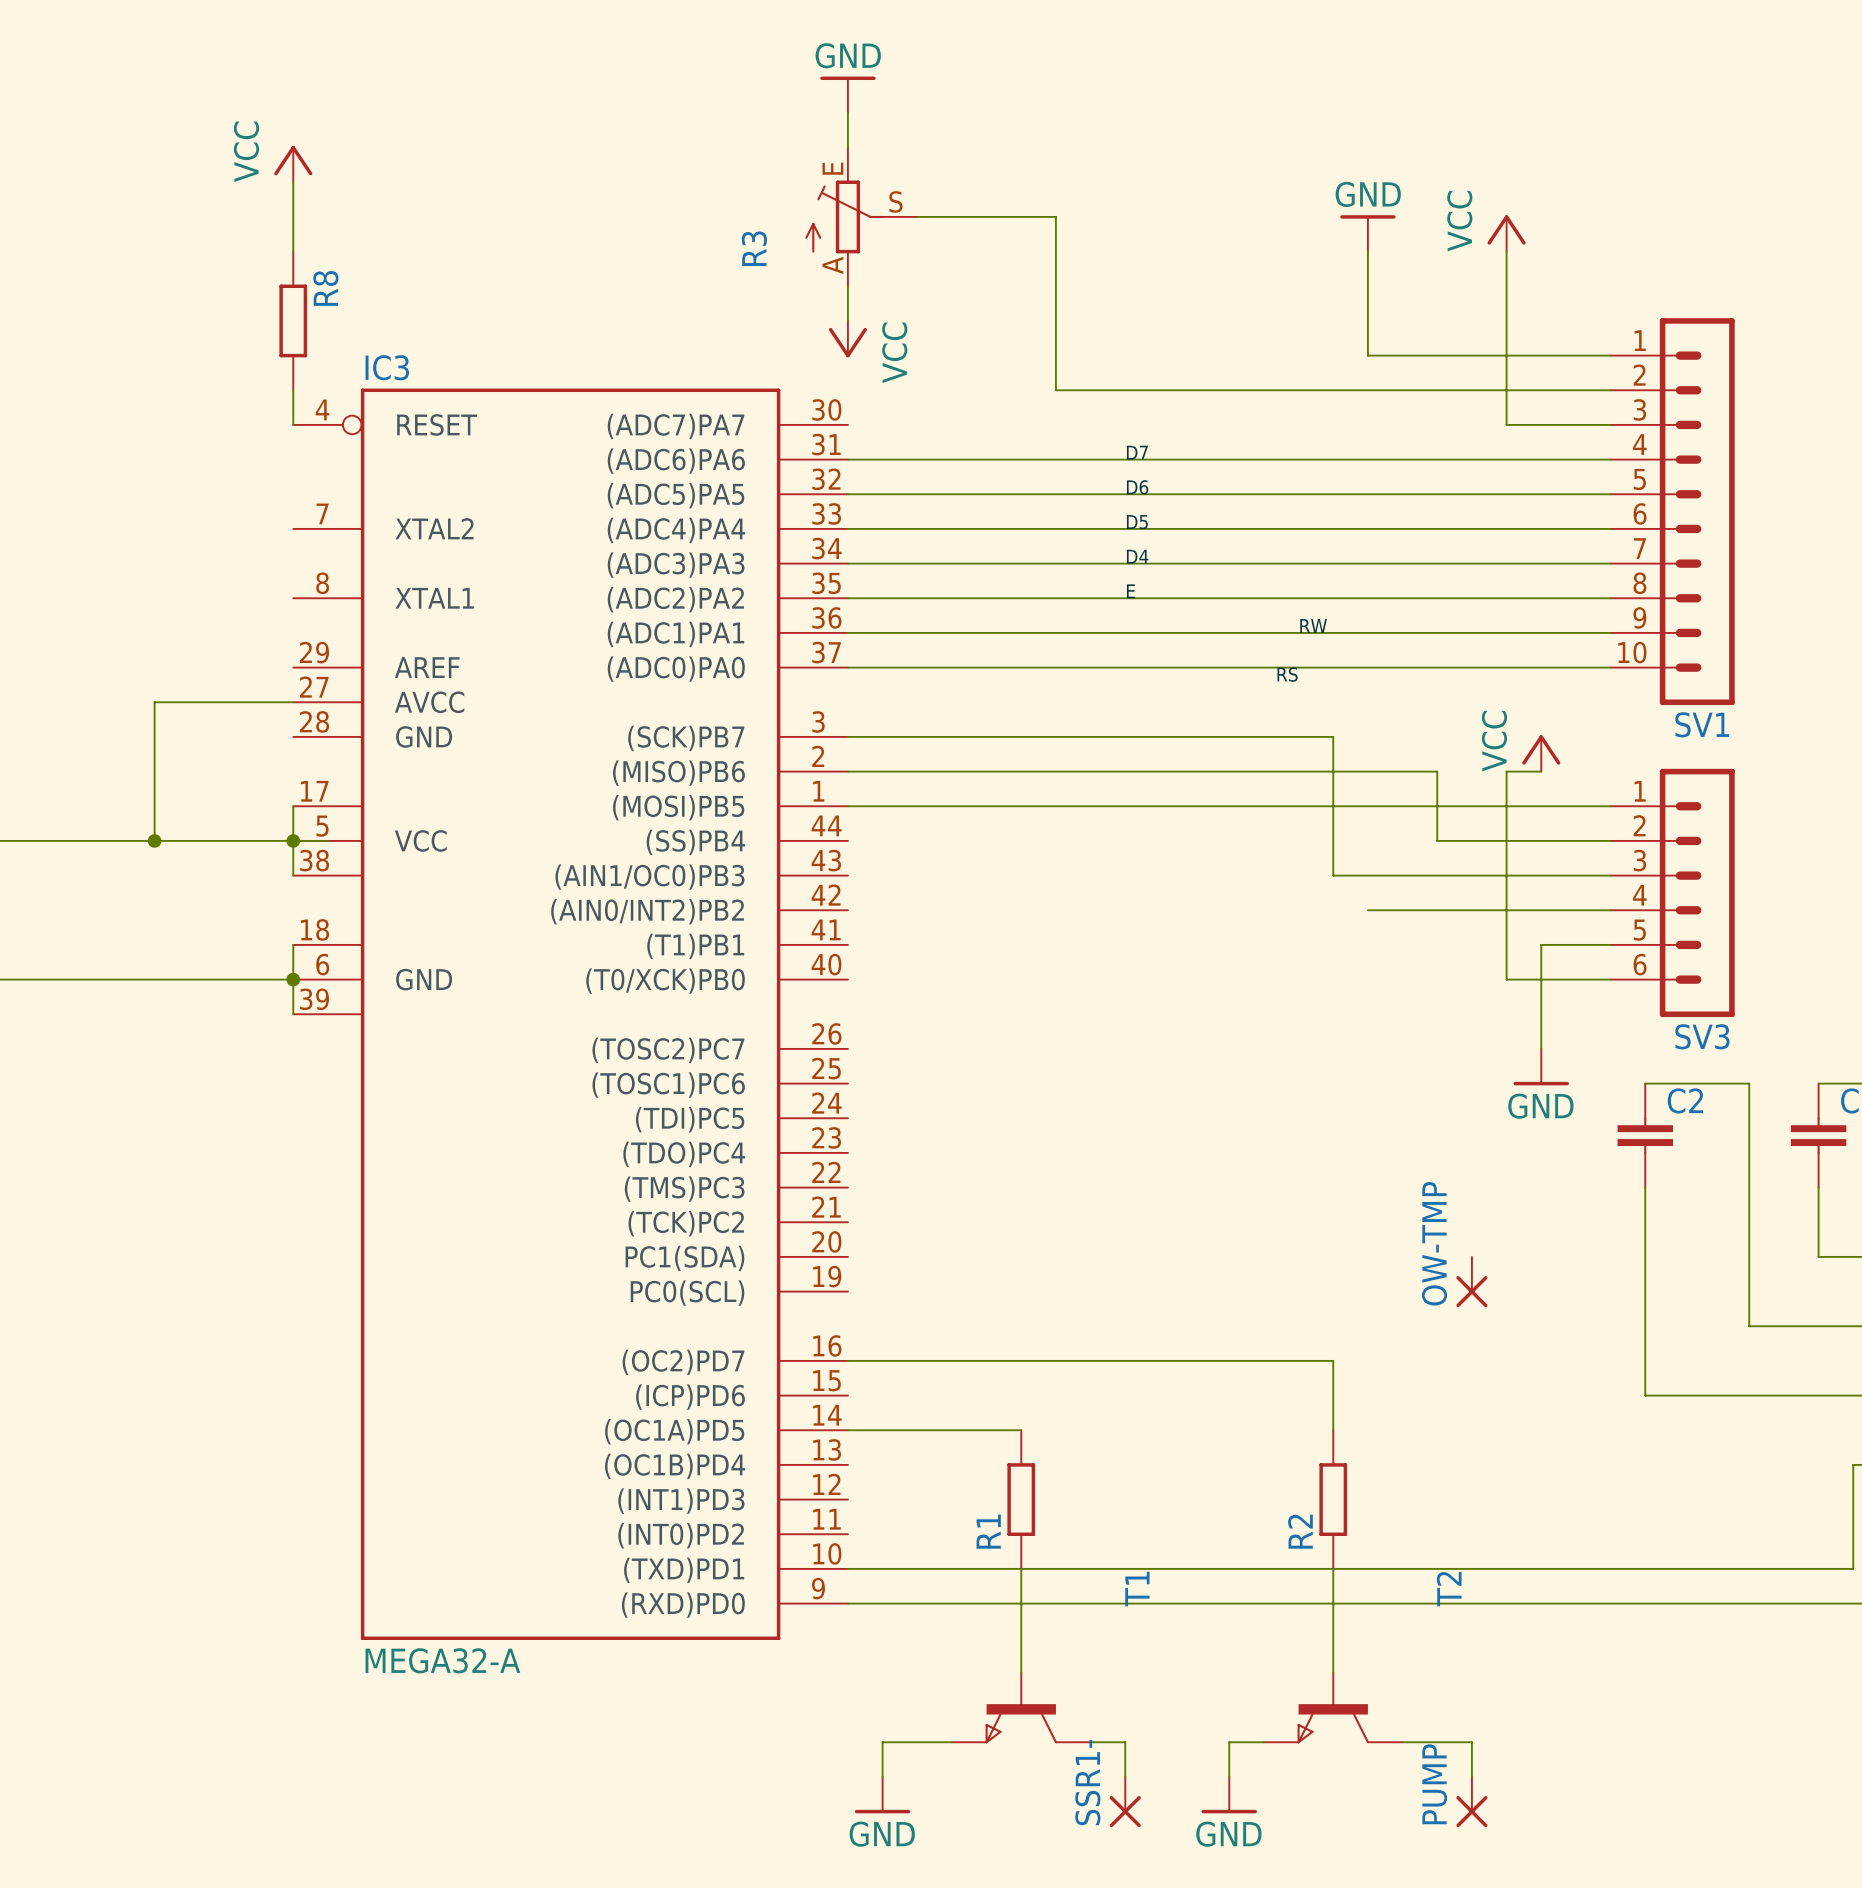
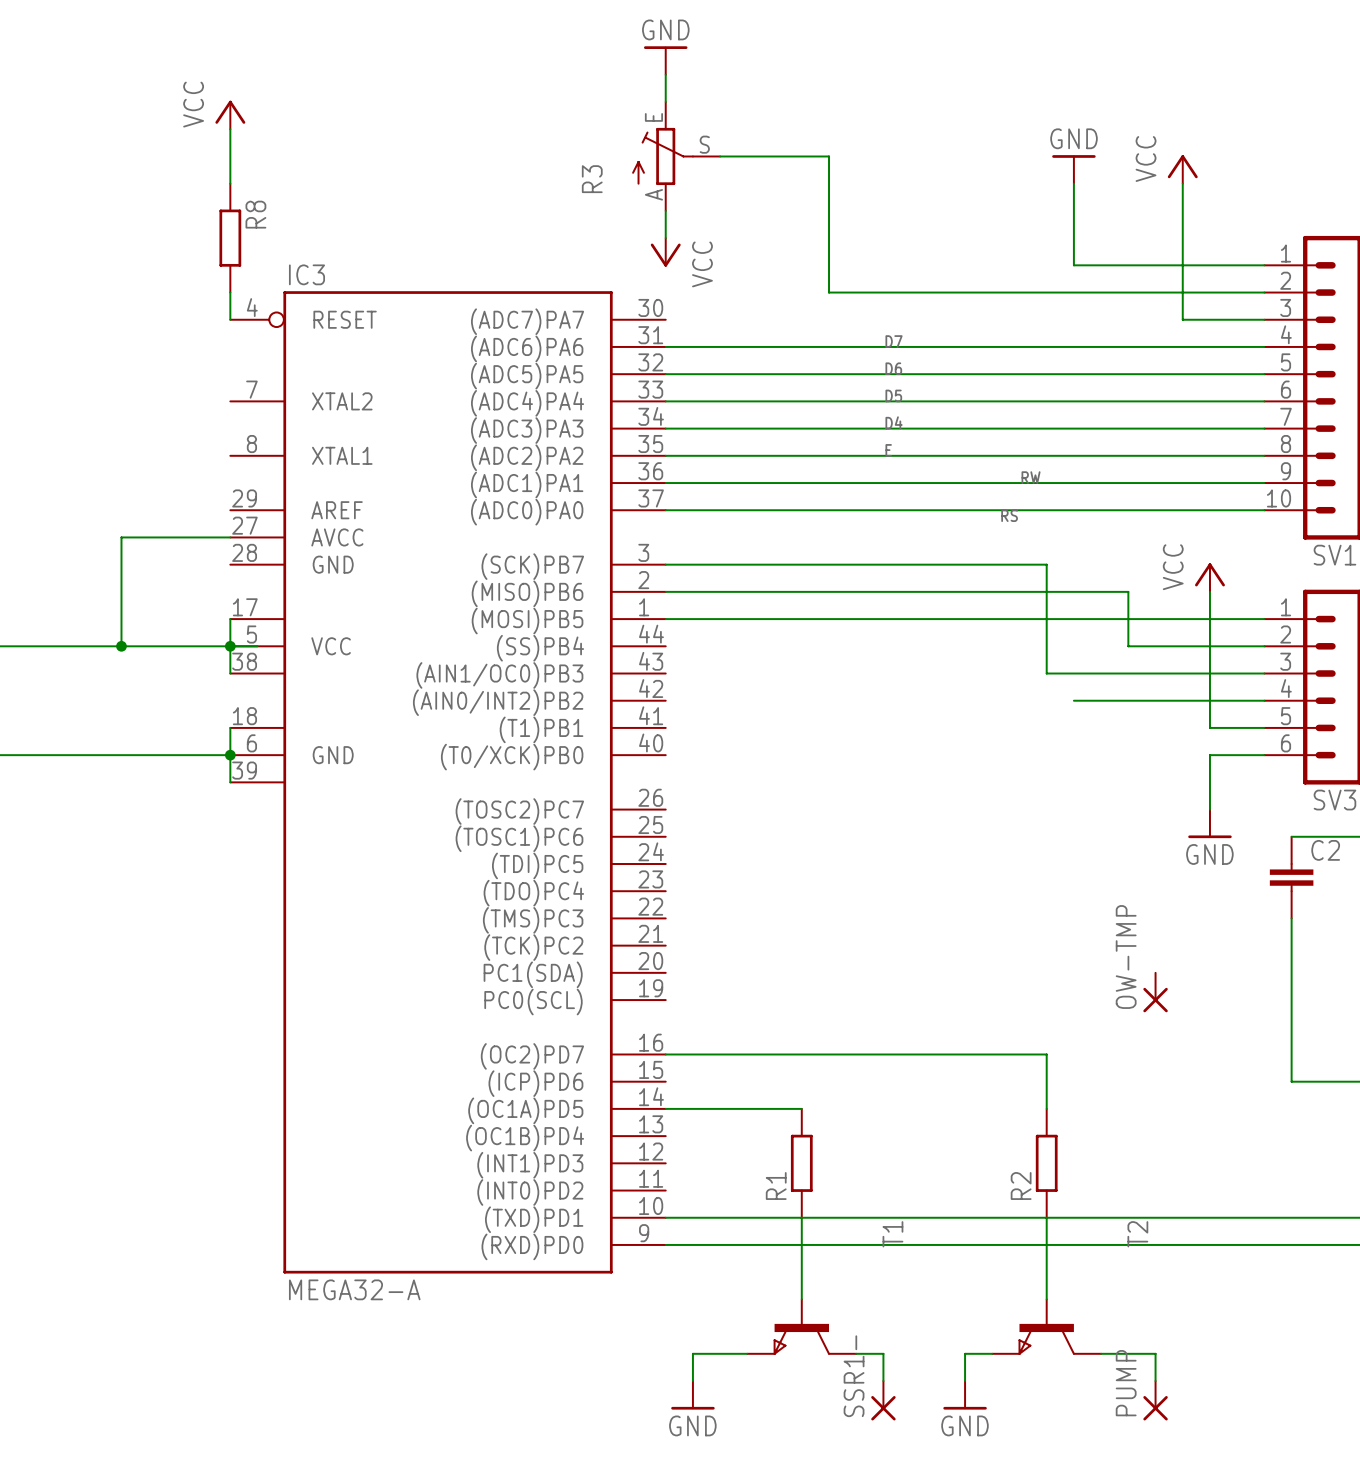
wire: (1541, 771) (1506, 771) (1506, 979) (1541, 979) (1541, 944) -> (1209, 591) (1209, 727)

